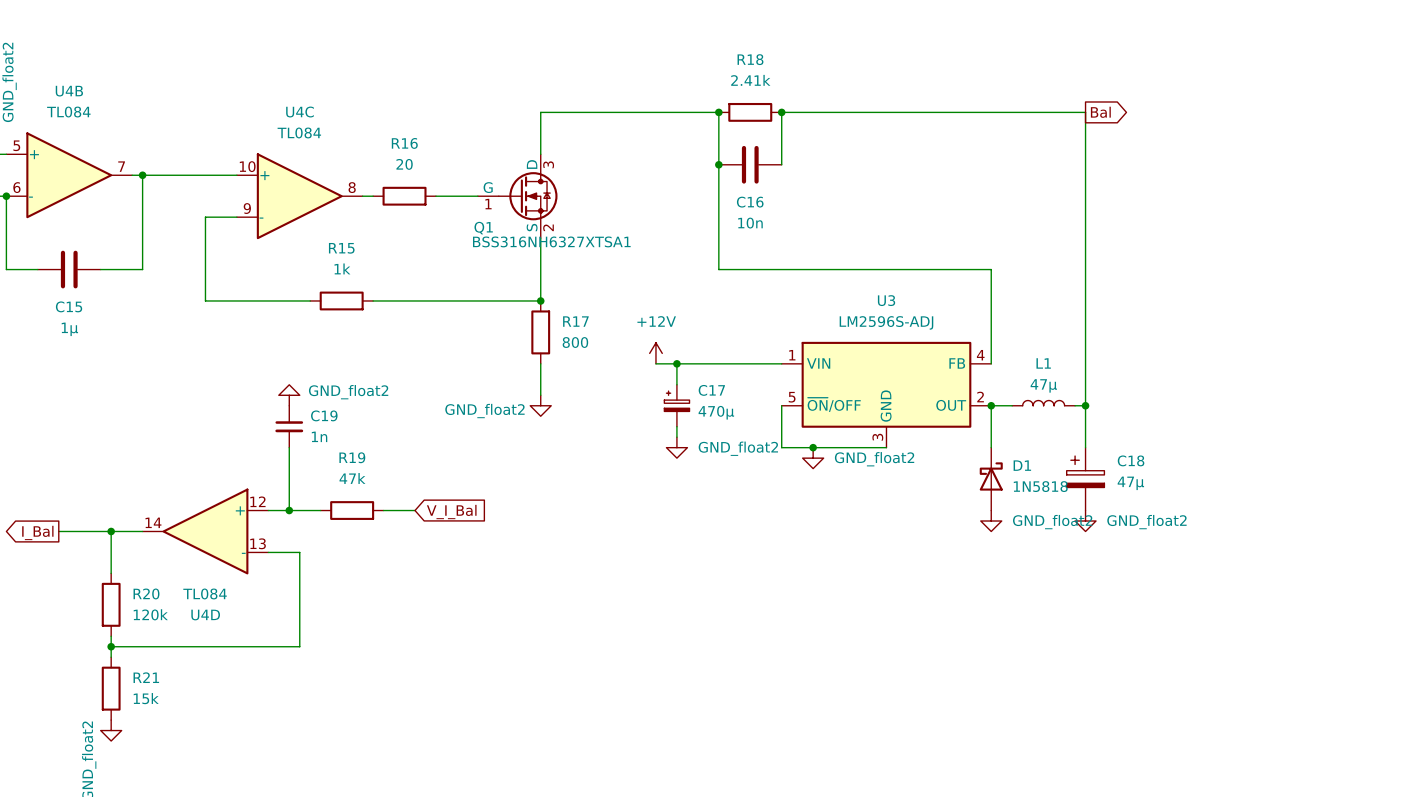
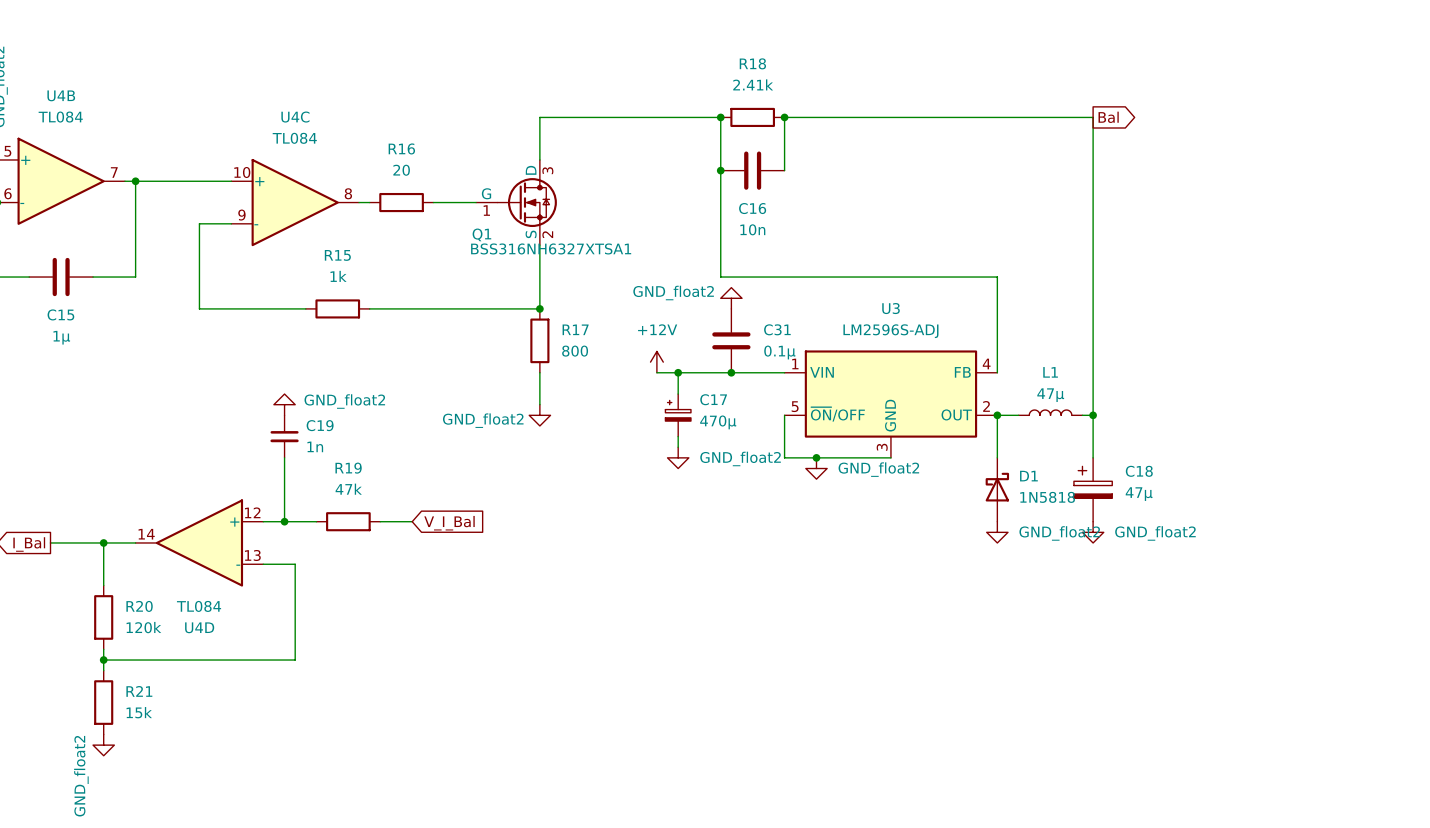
power symbol: none -> GND_float2 (731, 298)
C31: none -> 0.1µ (731, 340)
junction: none -> (731, 372)

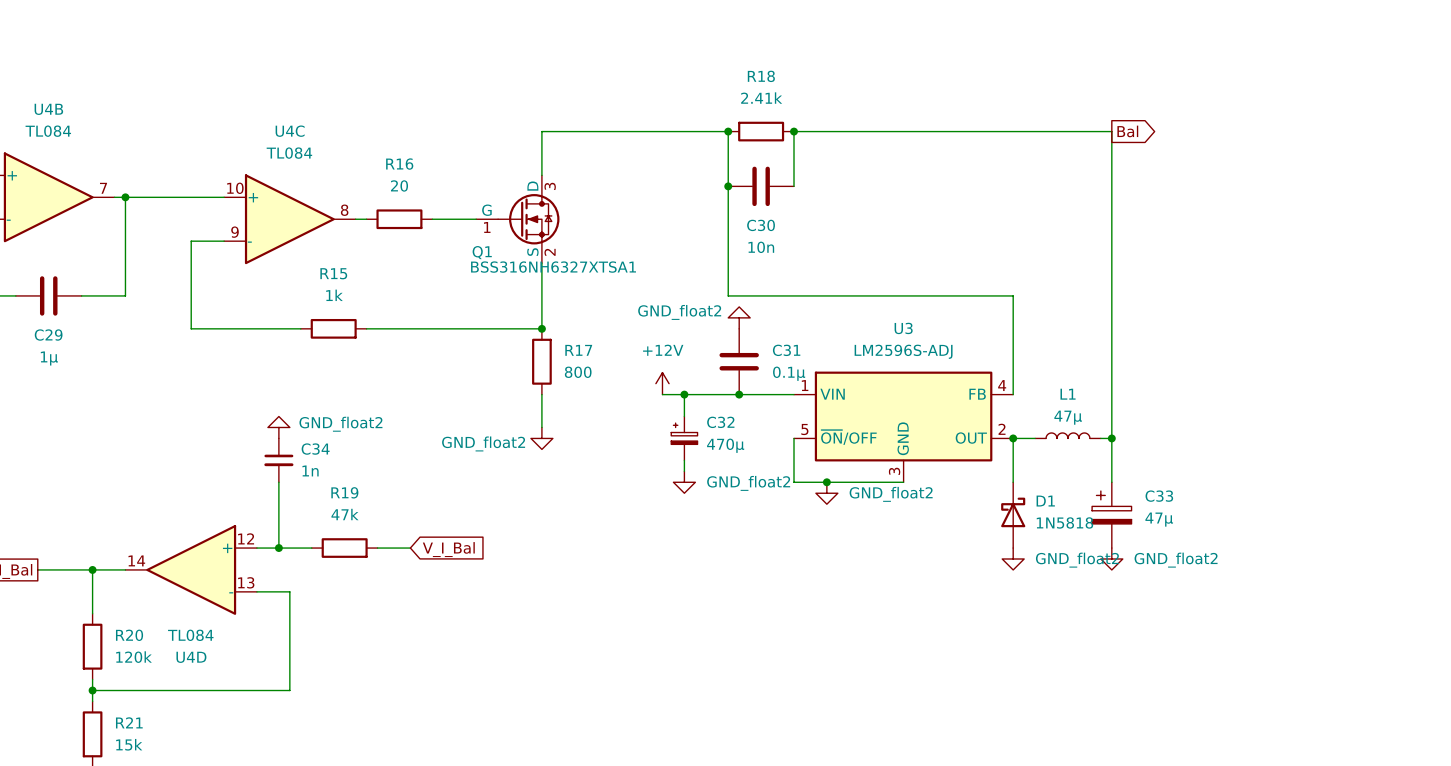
C16 name: C16 (752, 208) -> C30 (761, 225)
C15 name: C15 (60, 314) -> C29 (48, 335)
C17 name: C17 (713, 399) -> C32 (720, 422)
C19 name: C19 (320, 425) -> C34 (315, 449)
C18 name: C18 (1139, 471) -> C33 (1159, 496)

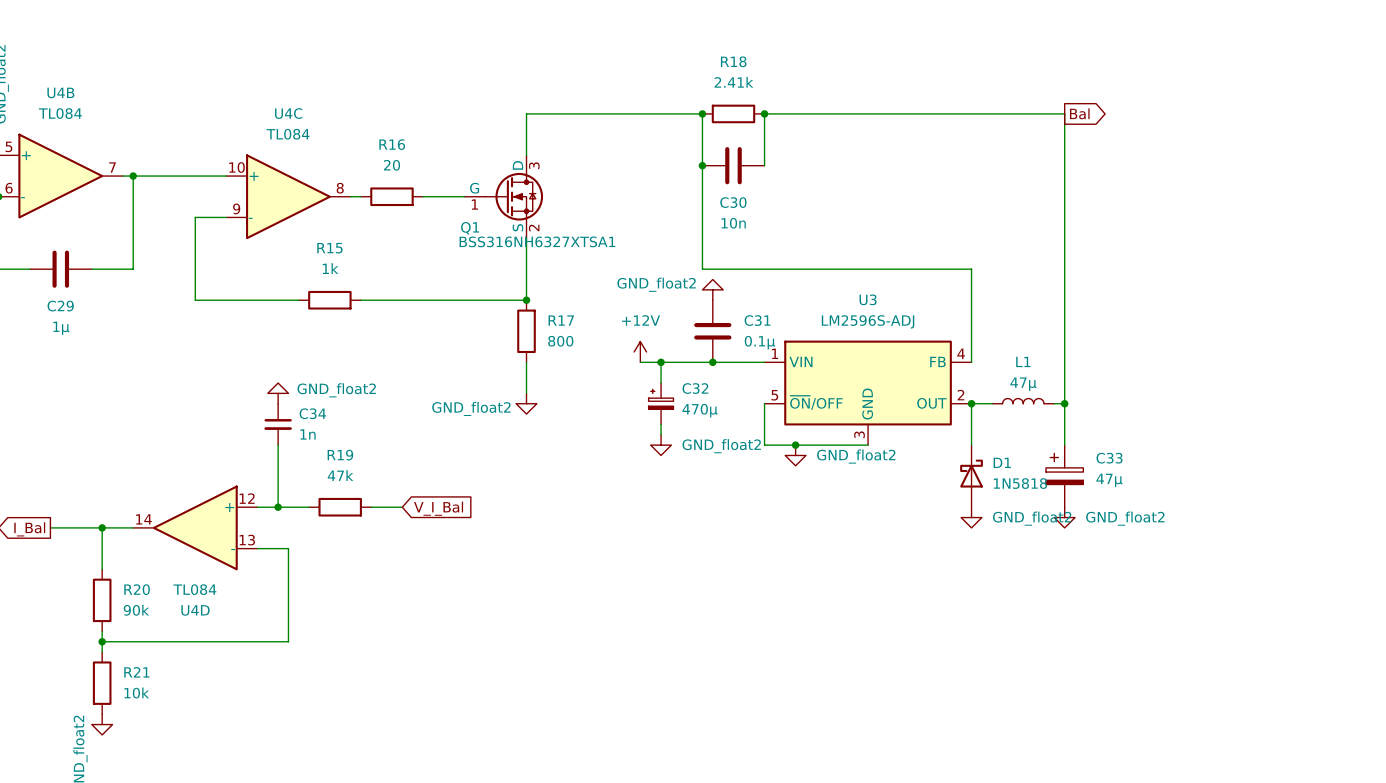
R20 value: 120k (134, 657) -> 90k (136, 610)
R21 value: 15k (129, 744) -> 10k (136, 693)

